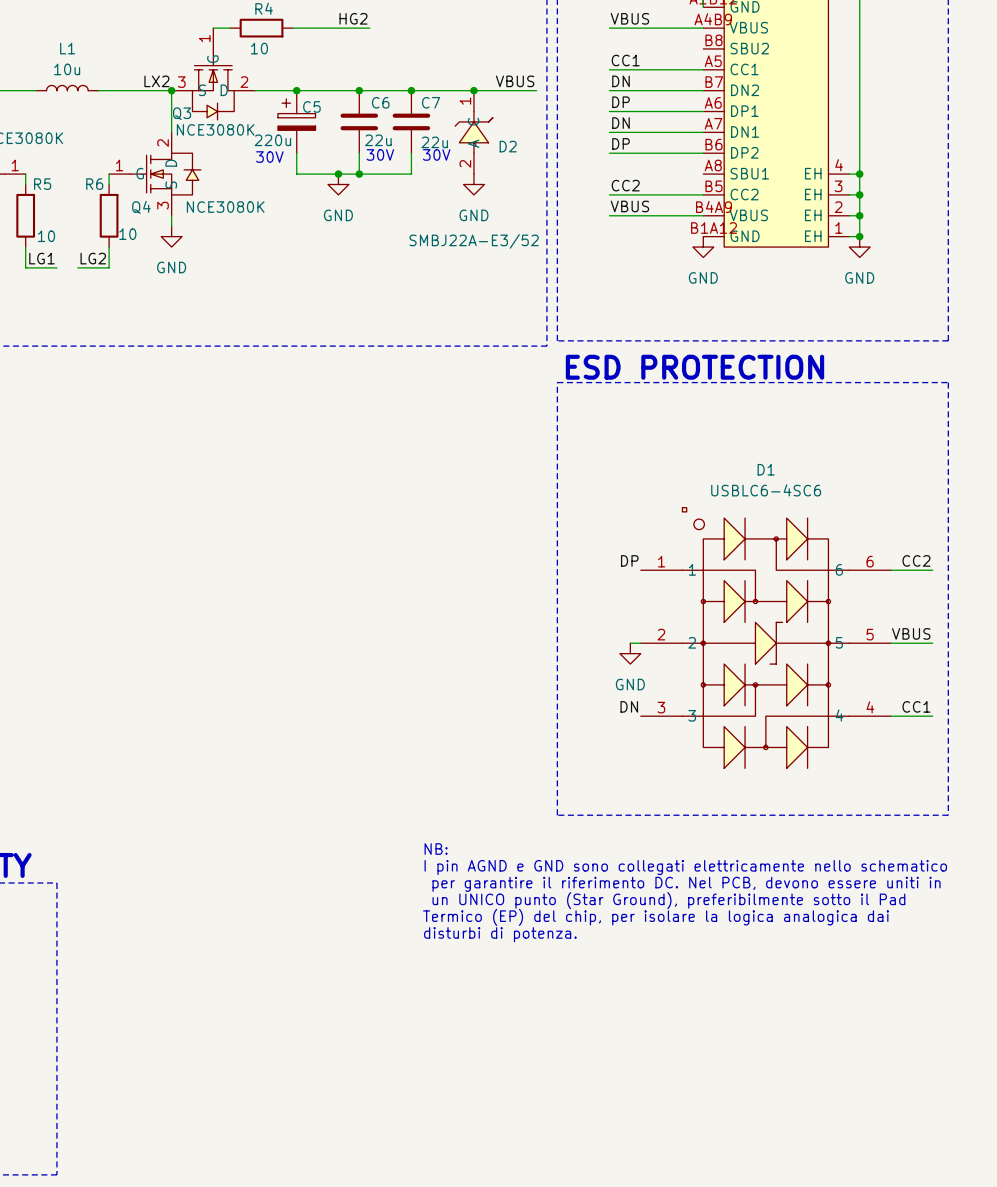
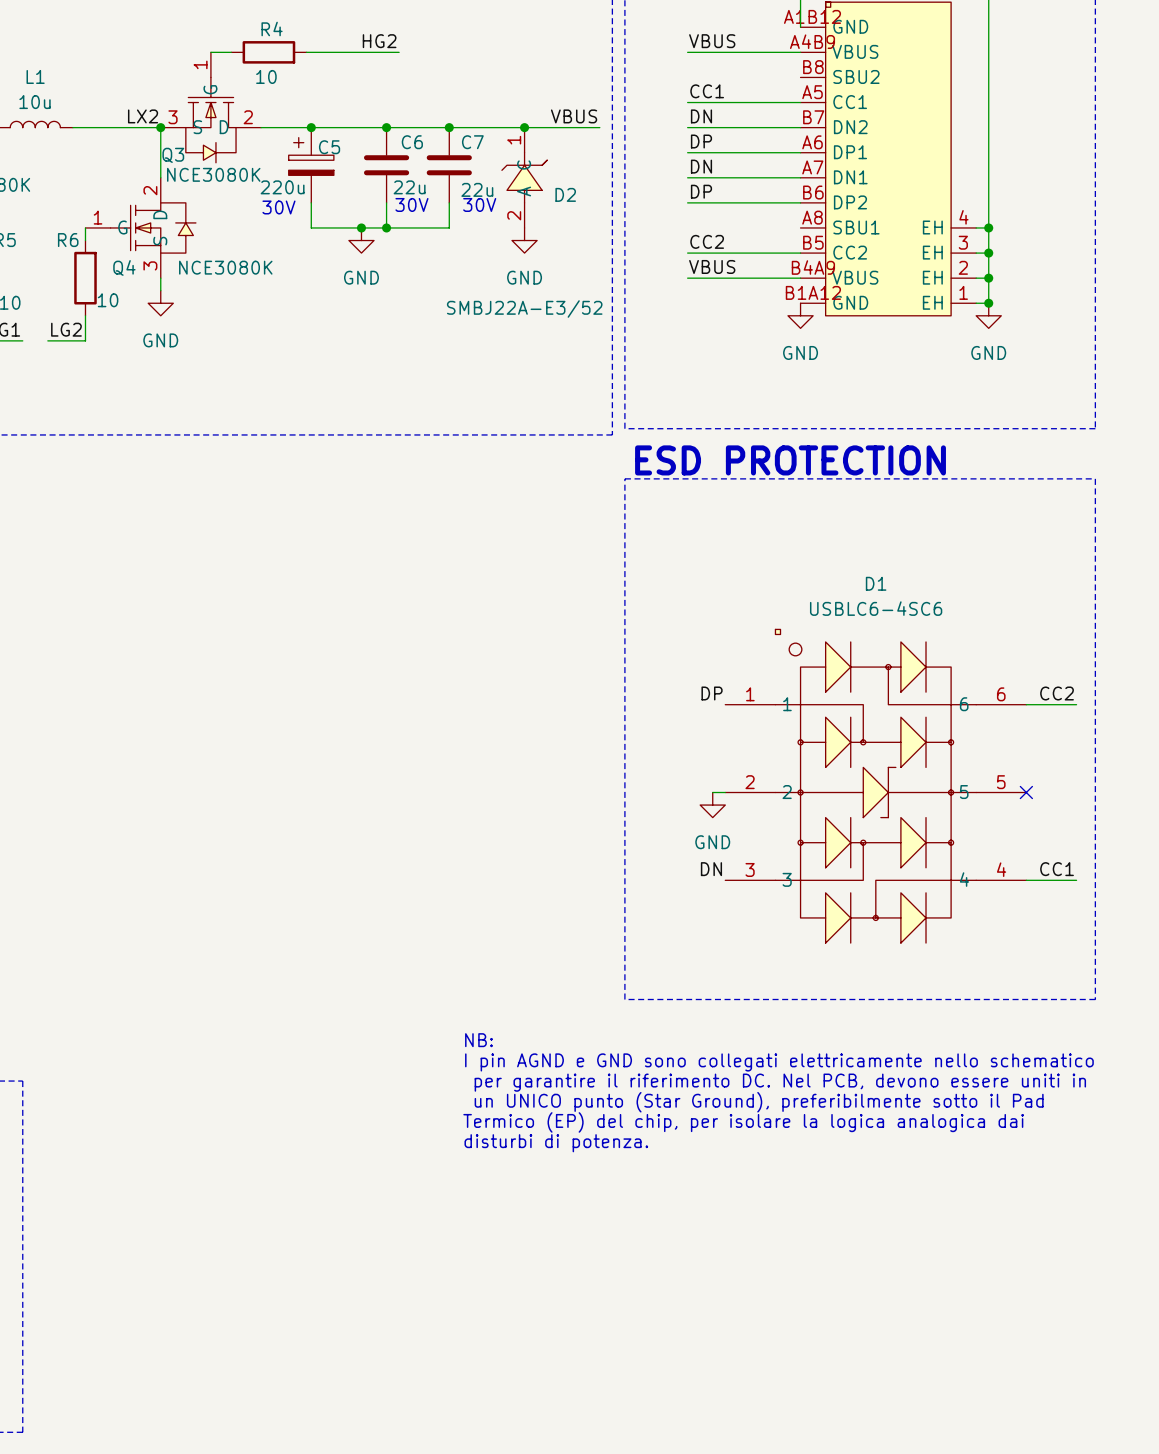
label: VBUS (911, 633) -> none
wire: (890, 643) (932, 643) -> none
no-connect mark: none -> (1026, 792)

